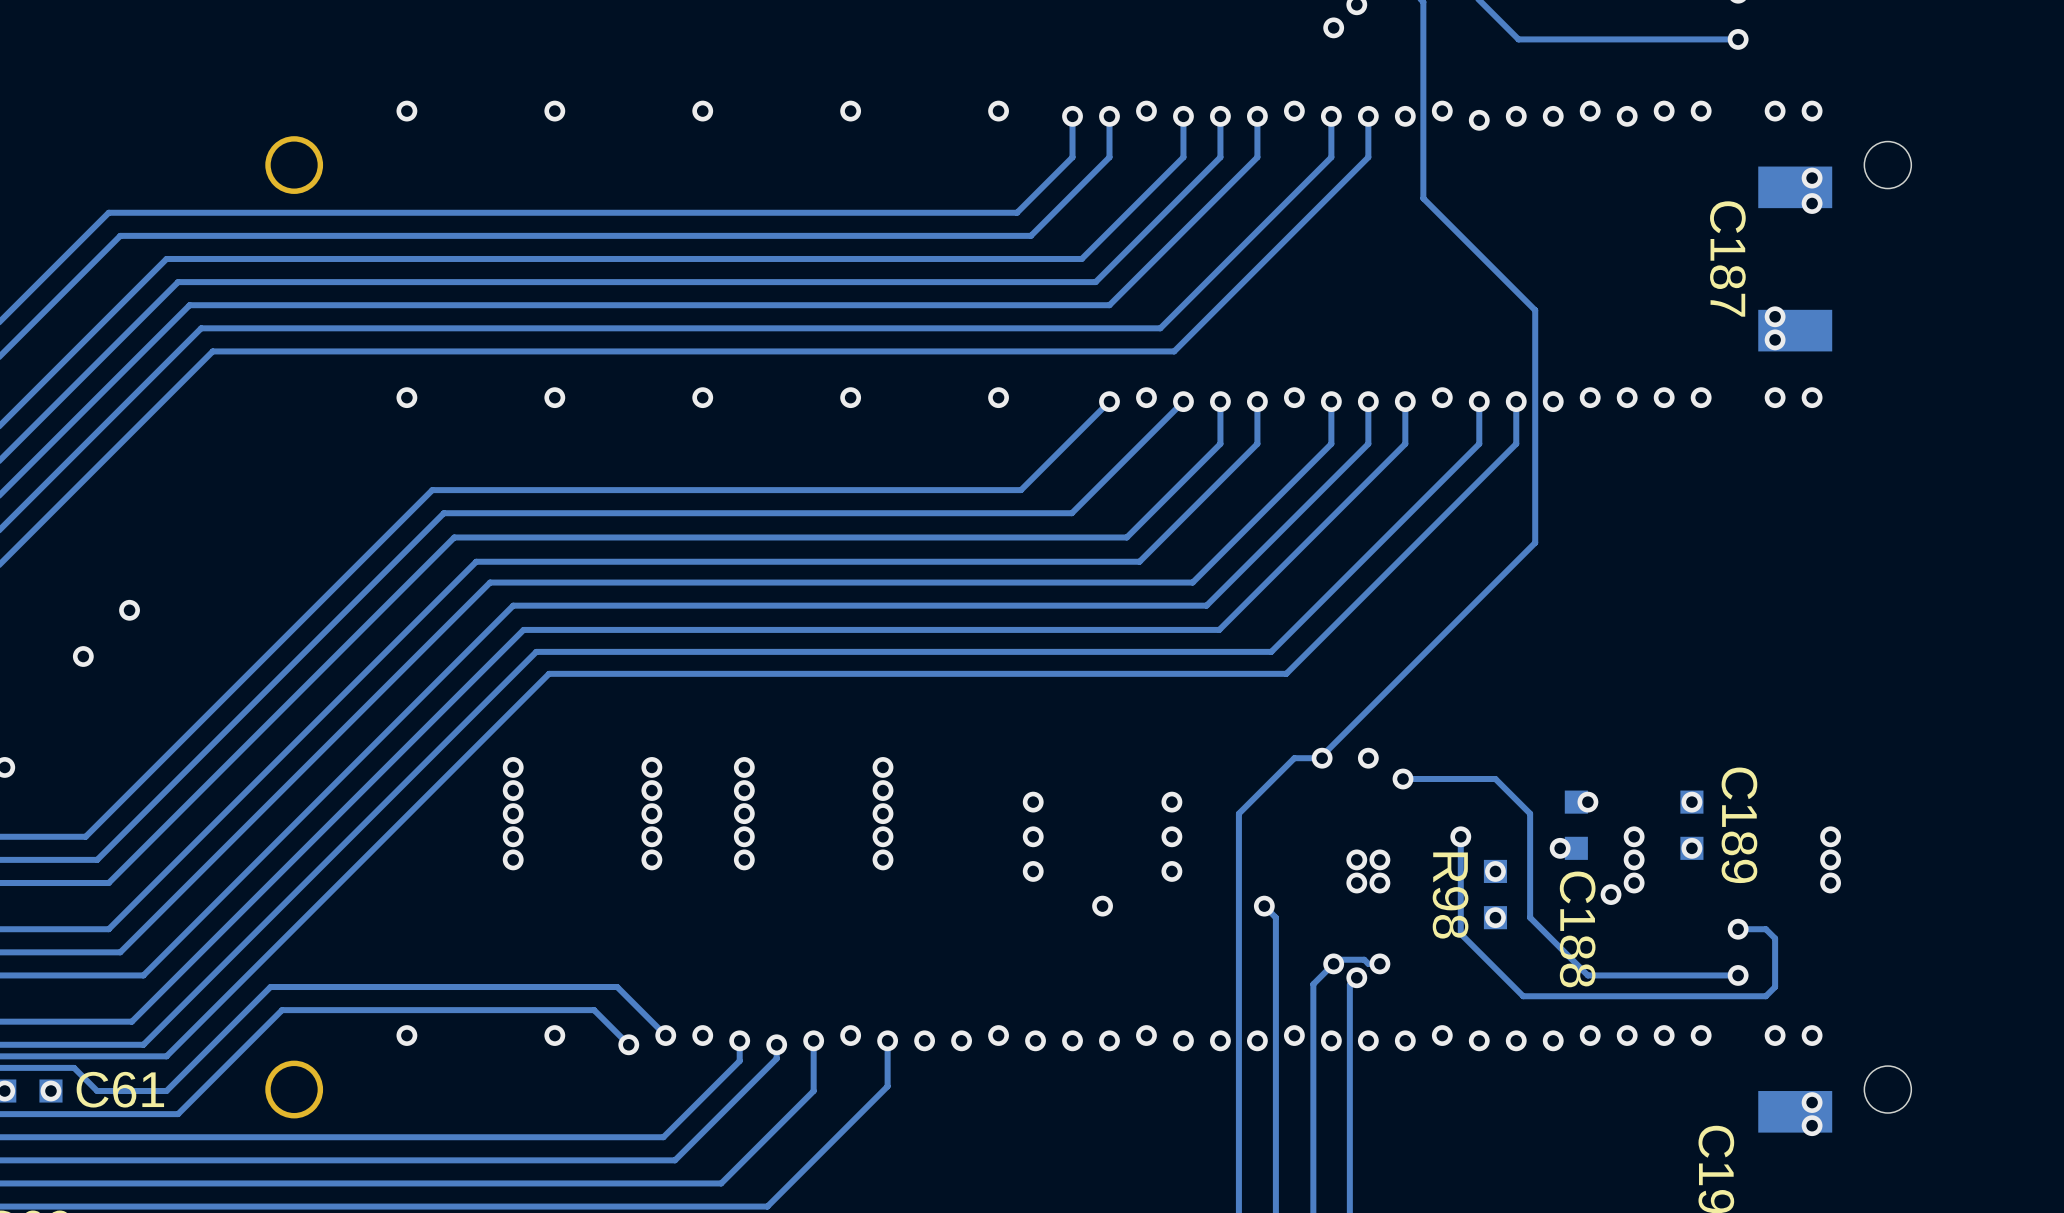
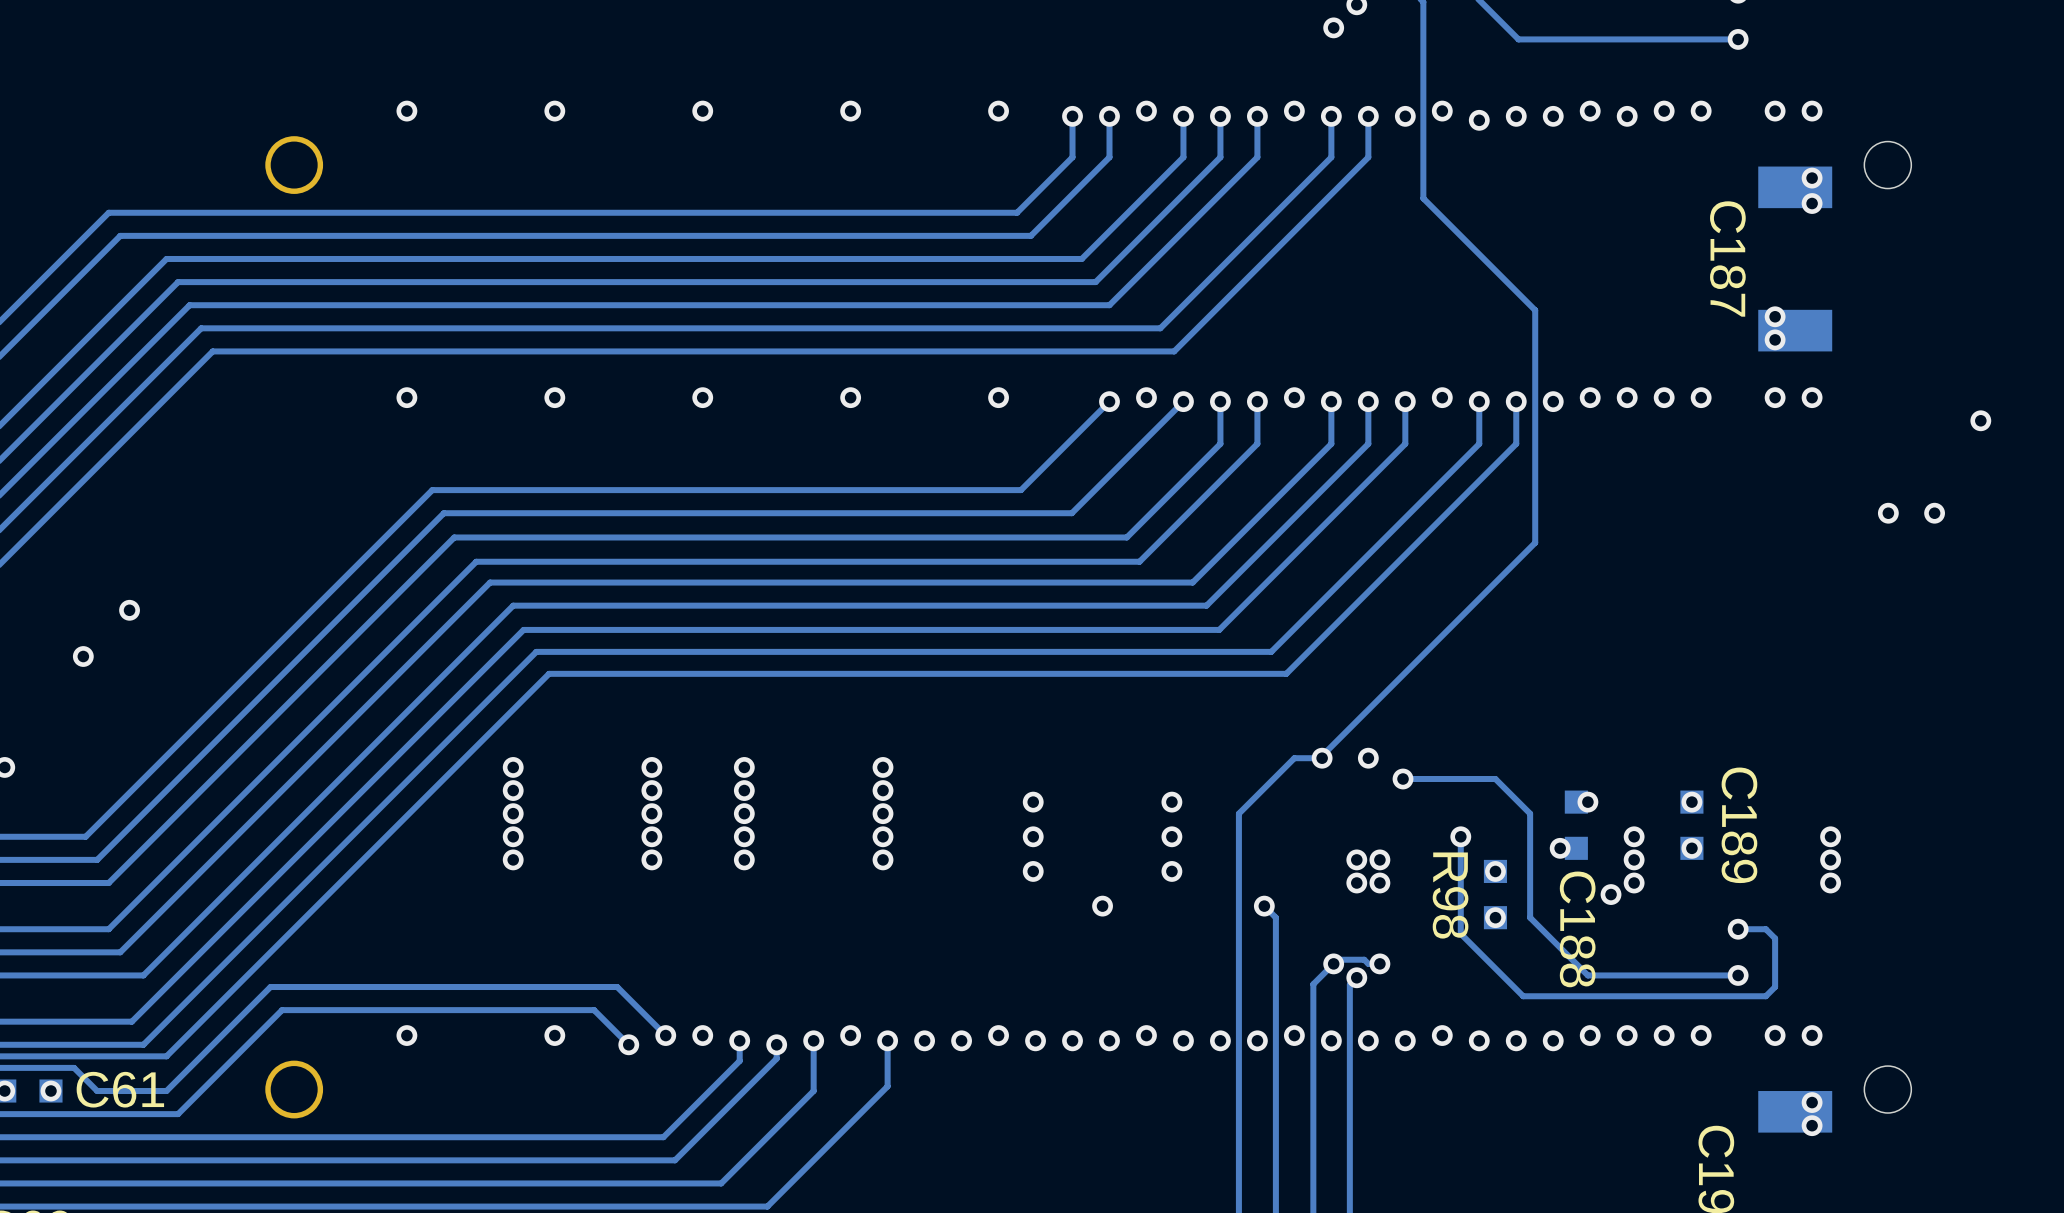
via: none -> (1980, 420)
via: none -> (1888, 513)
via: none -> (1934, 513)

